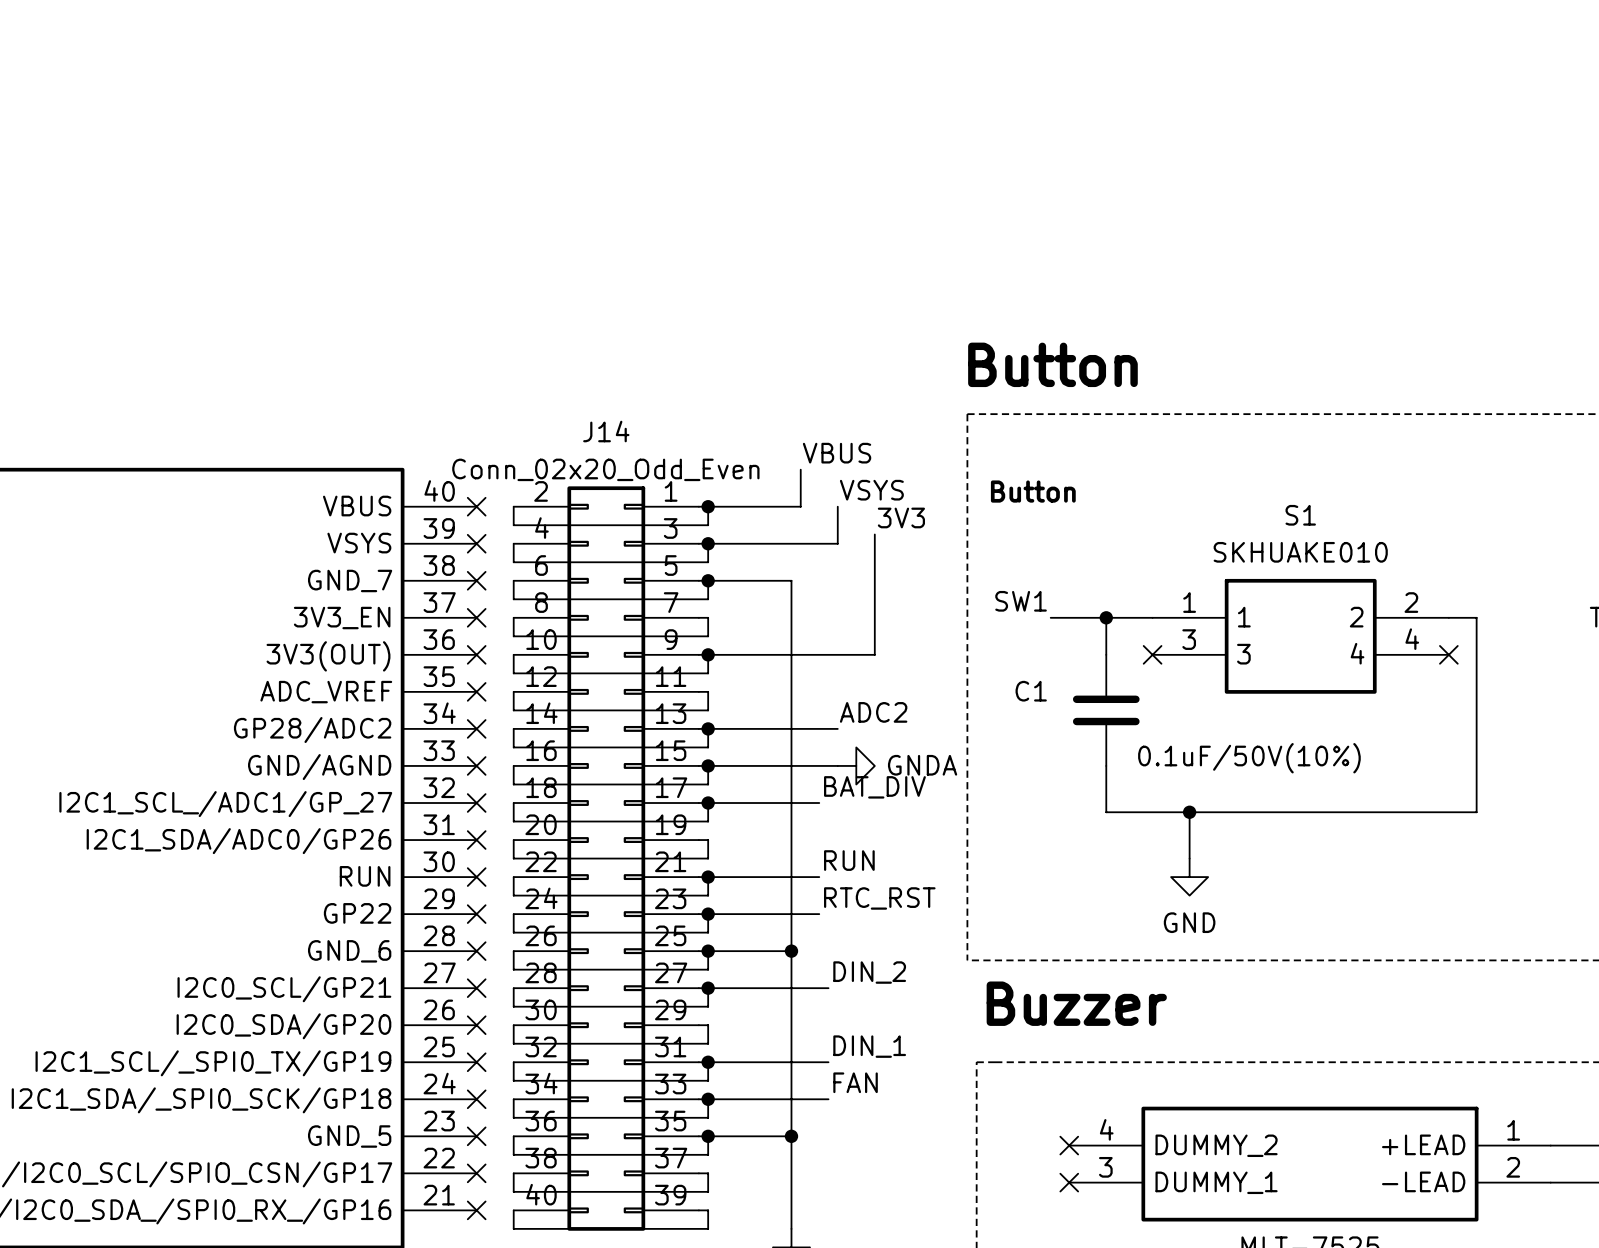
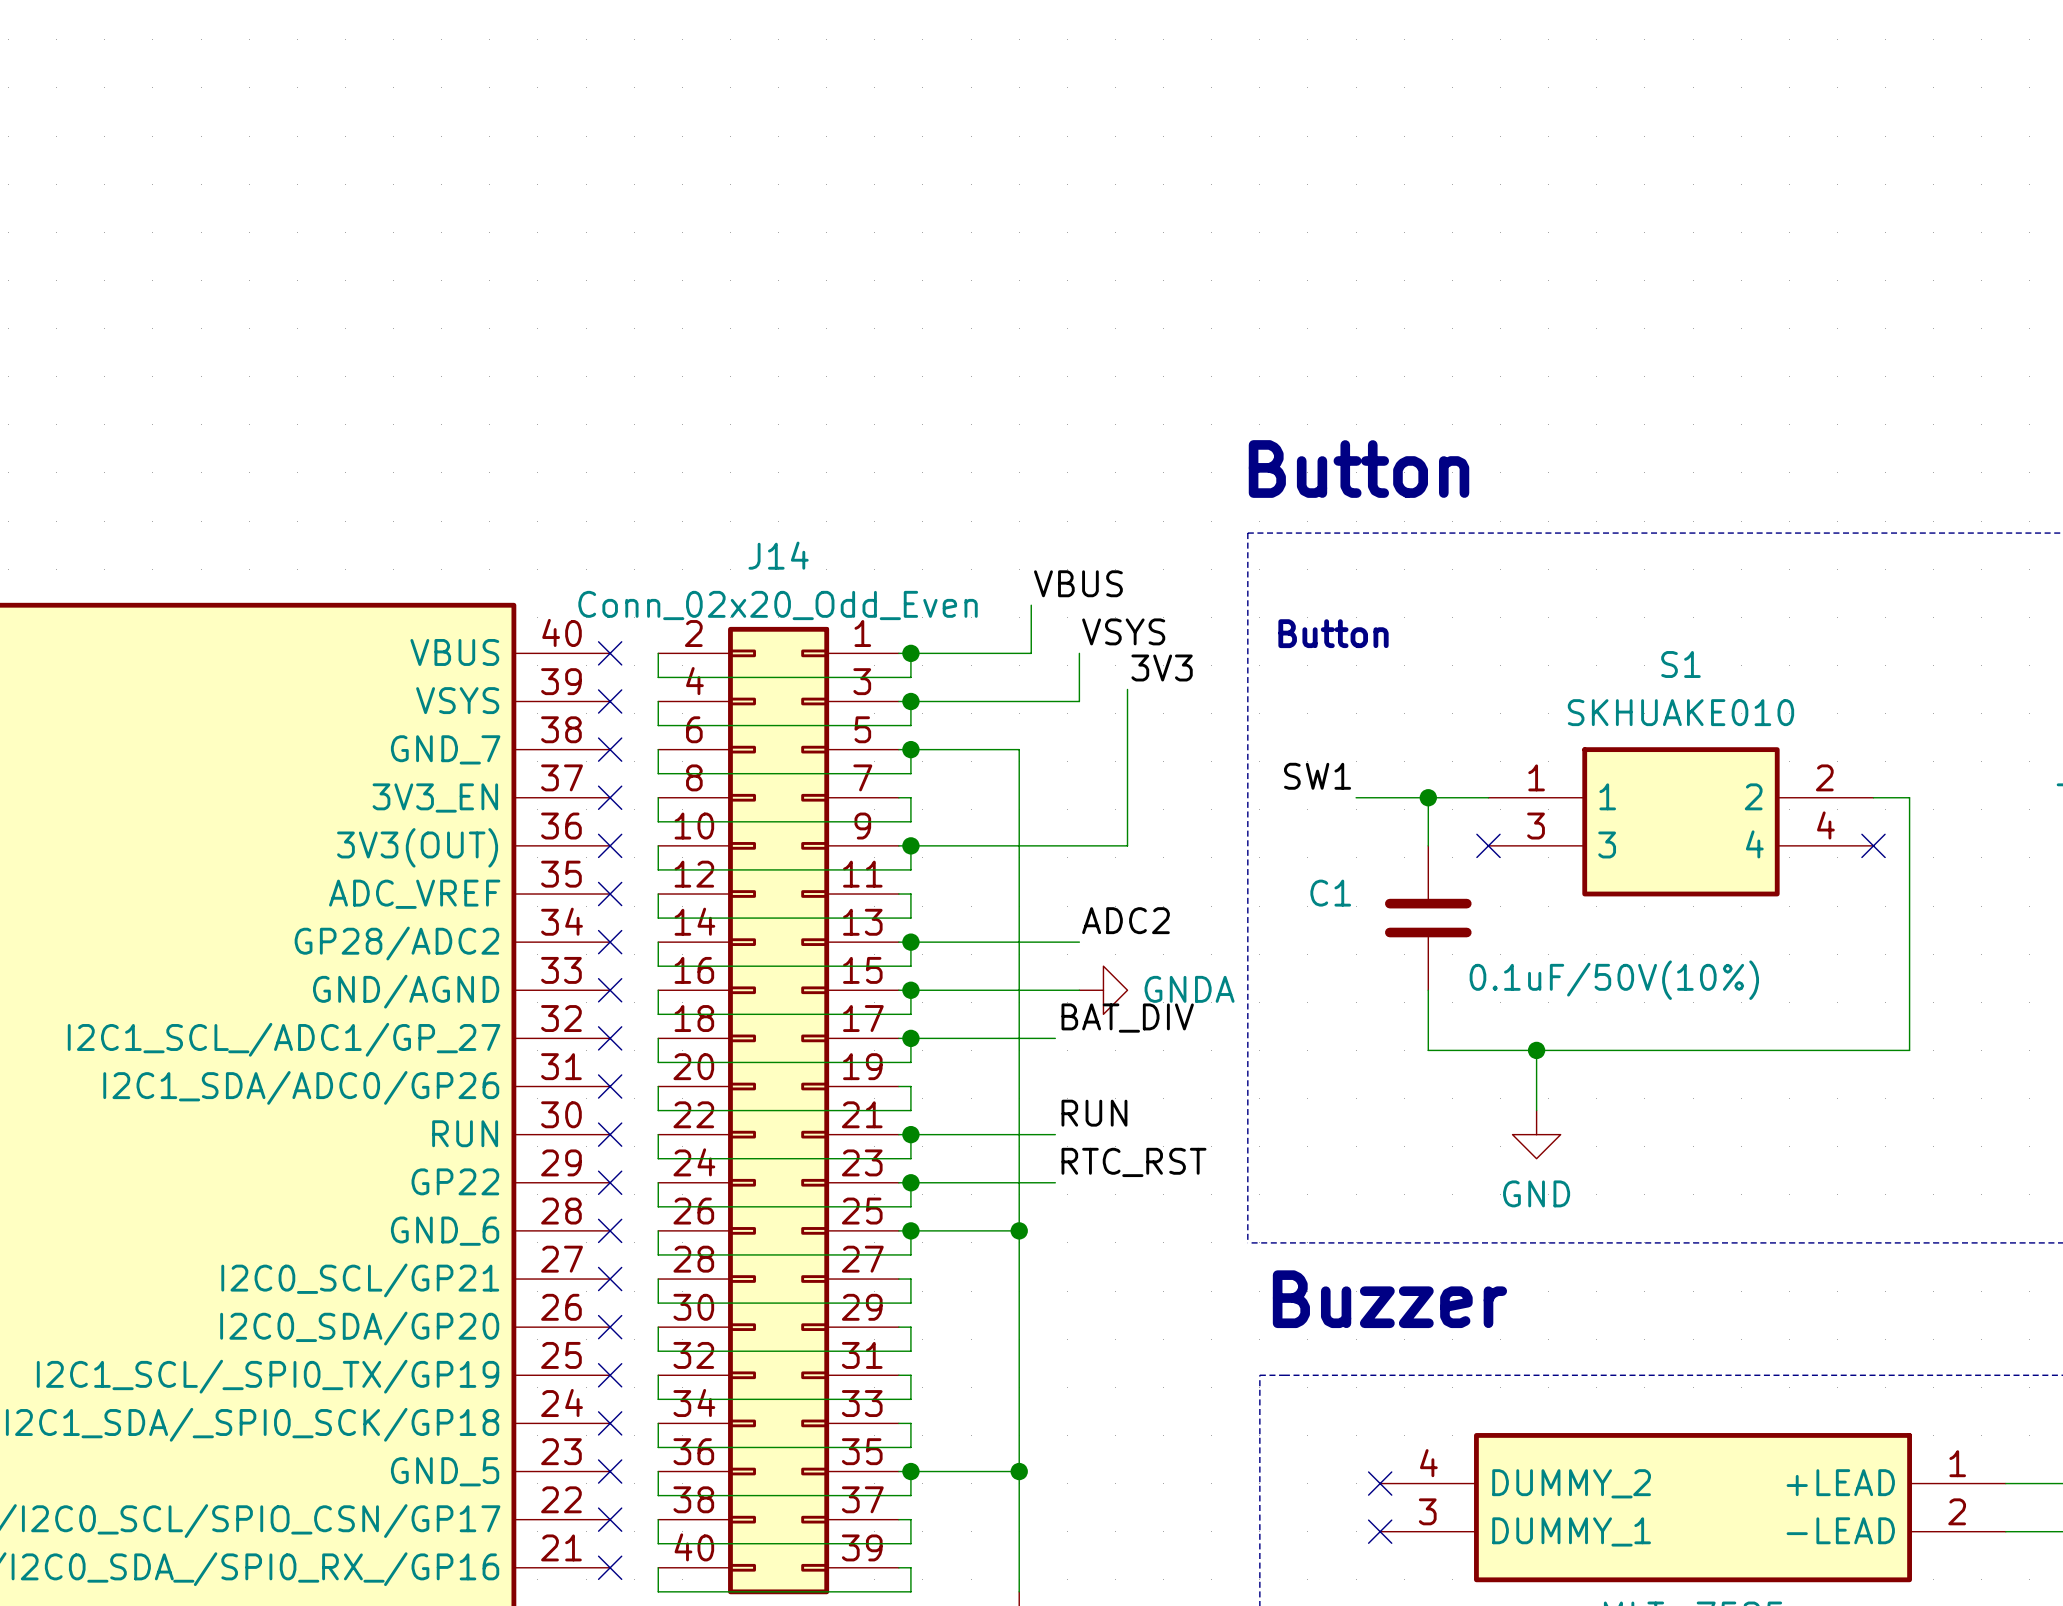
label: DIN_2 (869, 972) -> none
wire: (708, 988) (828, 988) -> none
junction: (708, 988) -> none
label: DIN_1 (869, 1046) -> none
wire: (708, 1062) (828, 1062) -> none
junction: (708, 1062) -> none
label: FAN (855, 1082) -> none
wire: (708, 1099) (828, 1099) -> none
junction: (708, 1099) -> none

